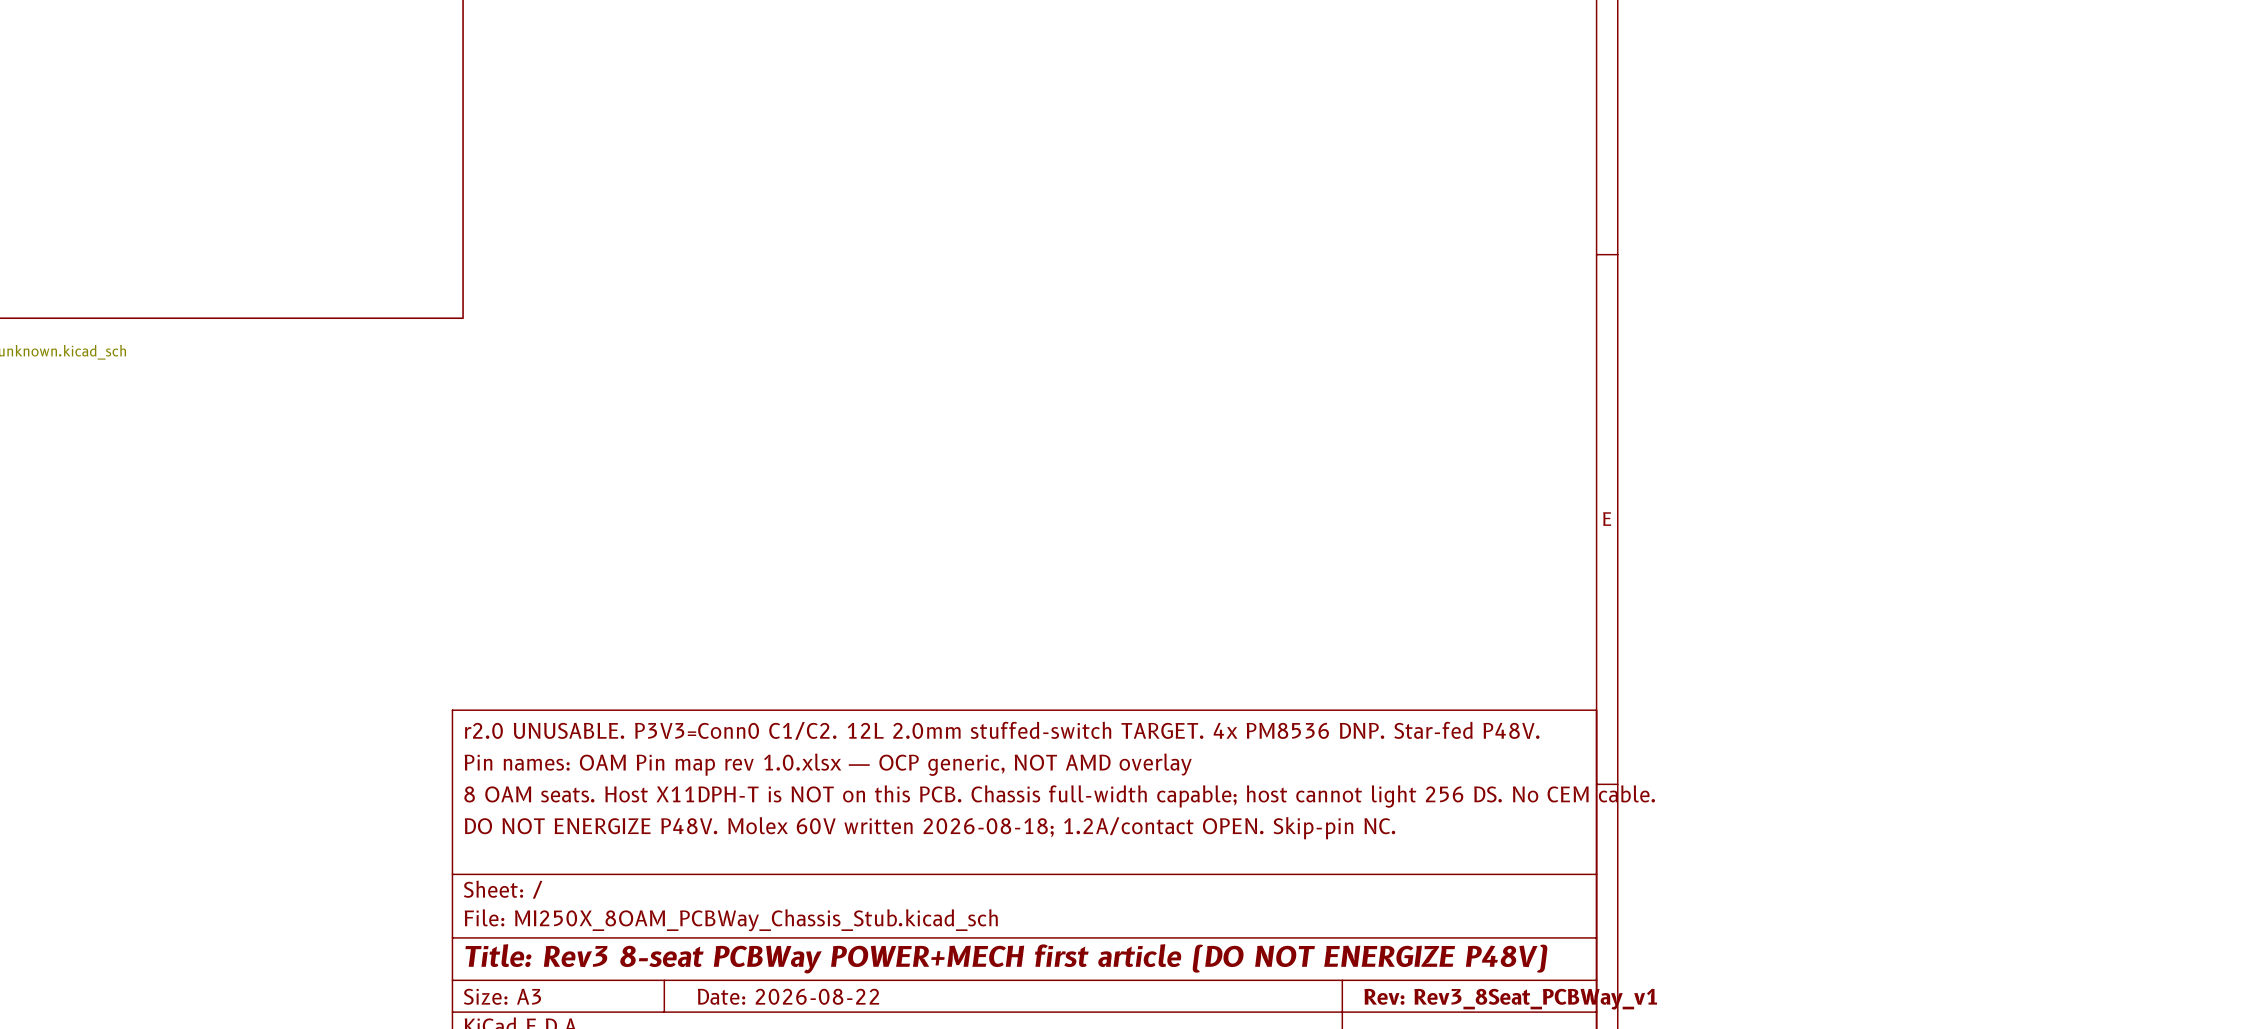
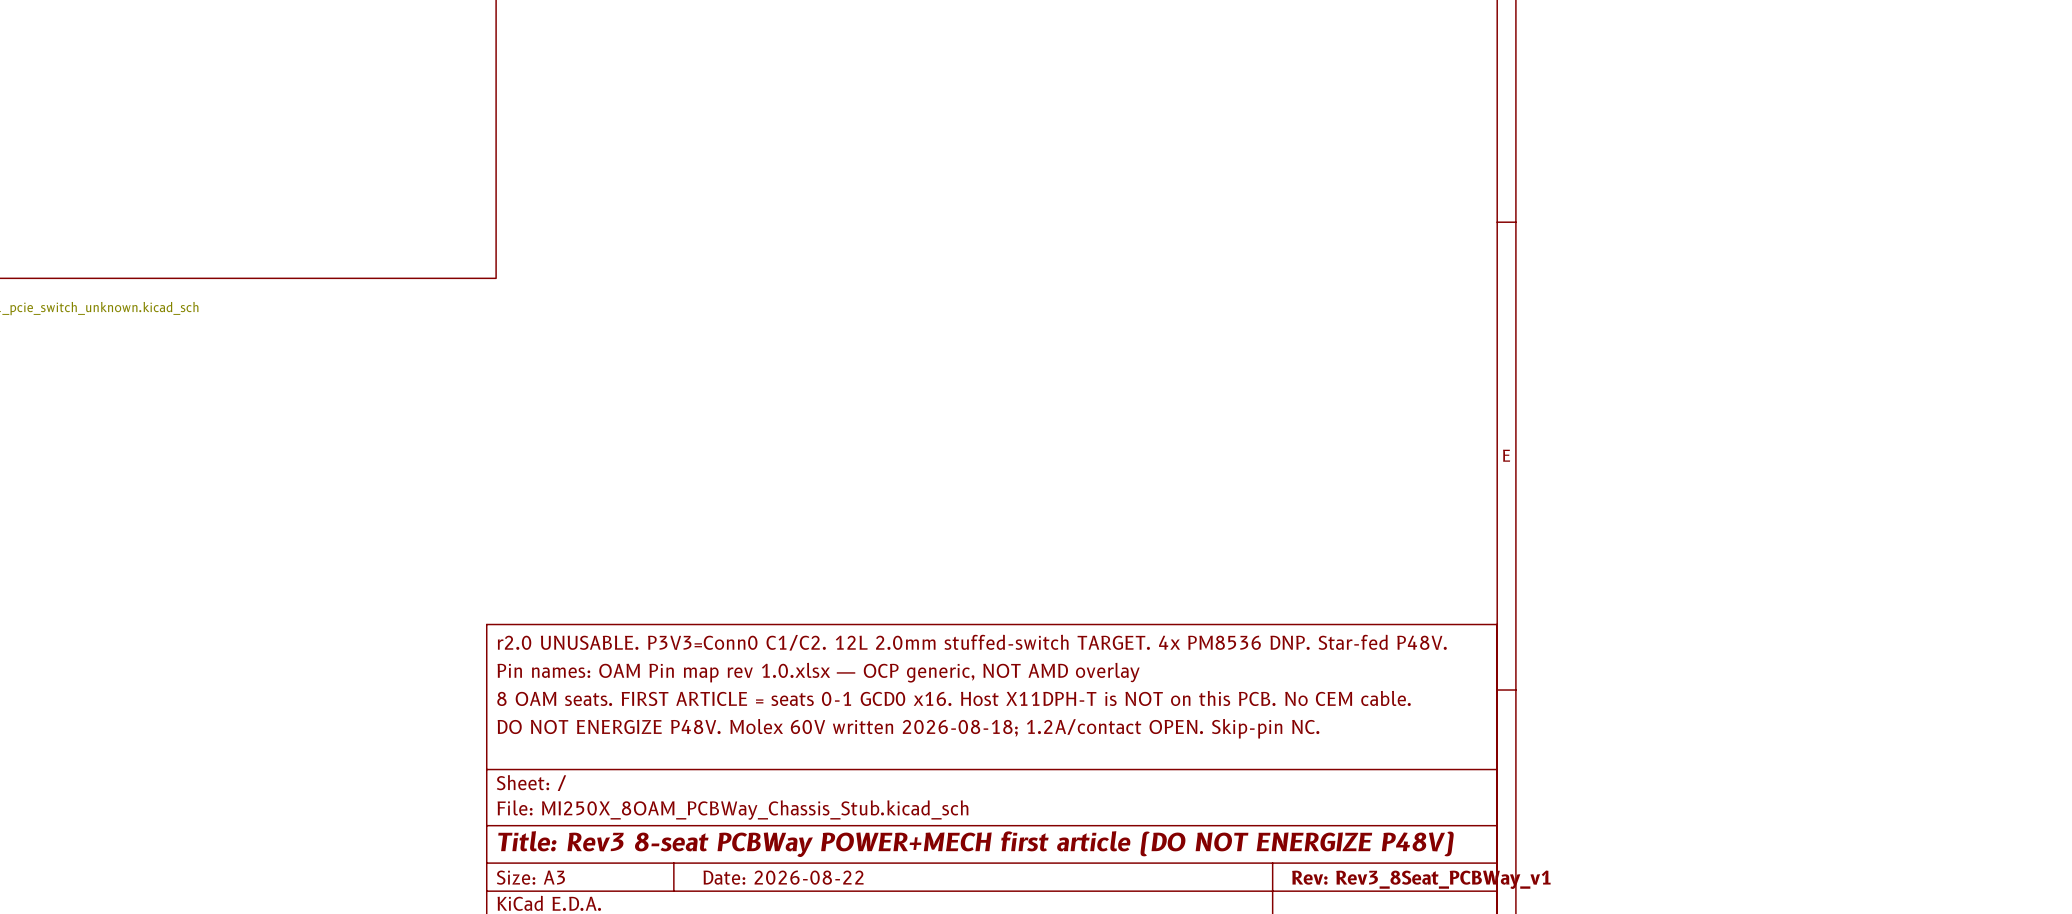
title block: 8 OAM seats. Host X11DPH-T is NOT on this PCB. Chassis full-width capable; host cannot light 256 DS. No CEM cable. (1059, 796) -> 8 OAM seats. FIRST ARTICLE = seats 0-1 GCD0 x16. Host X11DPH-T is NOT on this PCB. No CEM cable. (954, 698)

